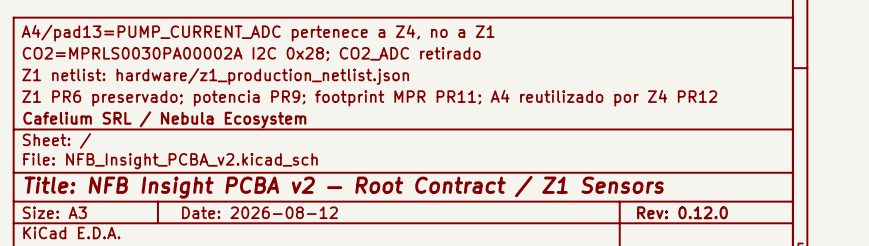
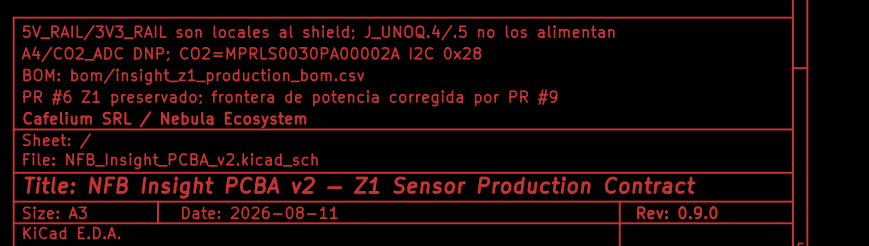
title block: A4/pad13=PUMP_CURRENT_ADC pertenece a Z4, no a Z1 (258, 33) -> 5V_RAIL/3V3_RAIL son locales al shield; J_UNOQ.4/.5 no los alimentan (318, 32)
title block: CO2=MPRLS0030PA00002A I2C 0x28; CO2_ADC retirado (251, 54) -> A4/CO2_ADC DNP; CO2=MPRLS0030PA00002A I2C 0x28 (251, 54)
title block: Z1 netlist: hardware/z1_production_netlist.json (215, 76) -> BOM: bom/insight_z1_production_bom.csv (193, 76)
title block: Z1 PR6 preservado; potencia PR9; footprint MPR PR11; A4 reutilizado por Z4 PR12 (369, 98) -> PR #6 Z1 preservado; frontera de potencia corregida por PR #9 (290, 97)
title block: Title: NFB Insight PCBA v2 — Root Contract / Z1 Sensors (344, 187) -> Title: NFB Insight PCBA v2 — Z1 Sensor Production Contract (359, 187)
title block: Date: 2026-08-12 (259, 212) -> Date: 2026-08-11 (259, 212)
title block: Rev: 0.12.0 (682, 212) -> Rev: 0.9.0 (677, 212)

